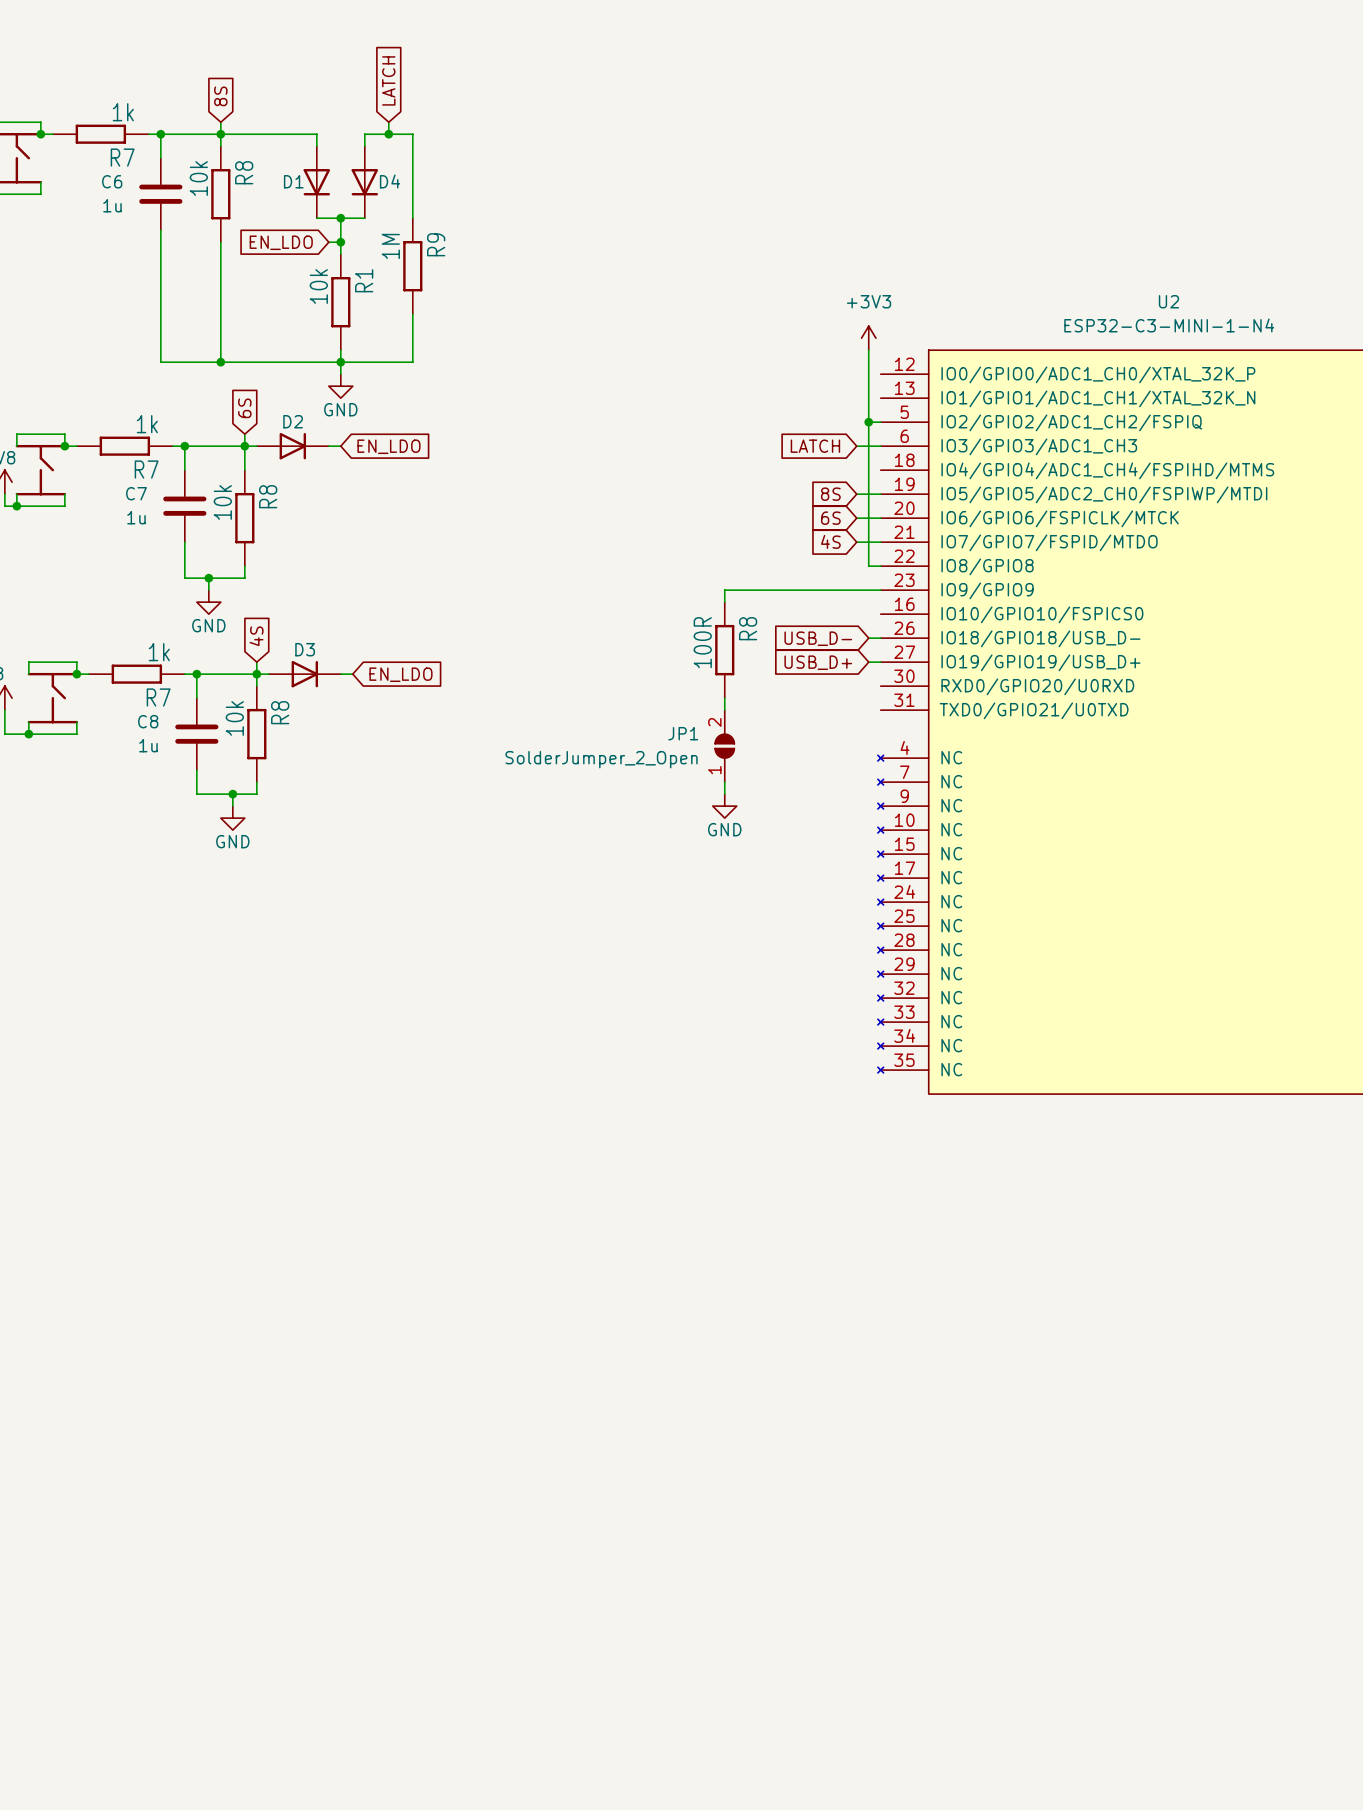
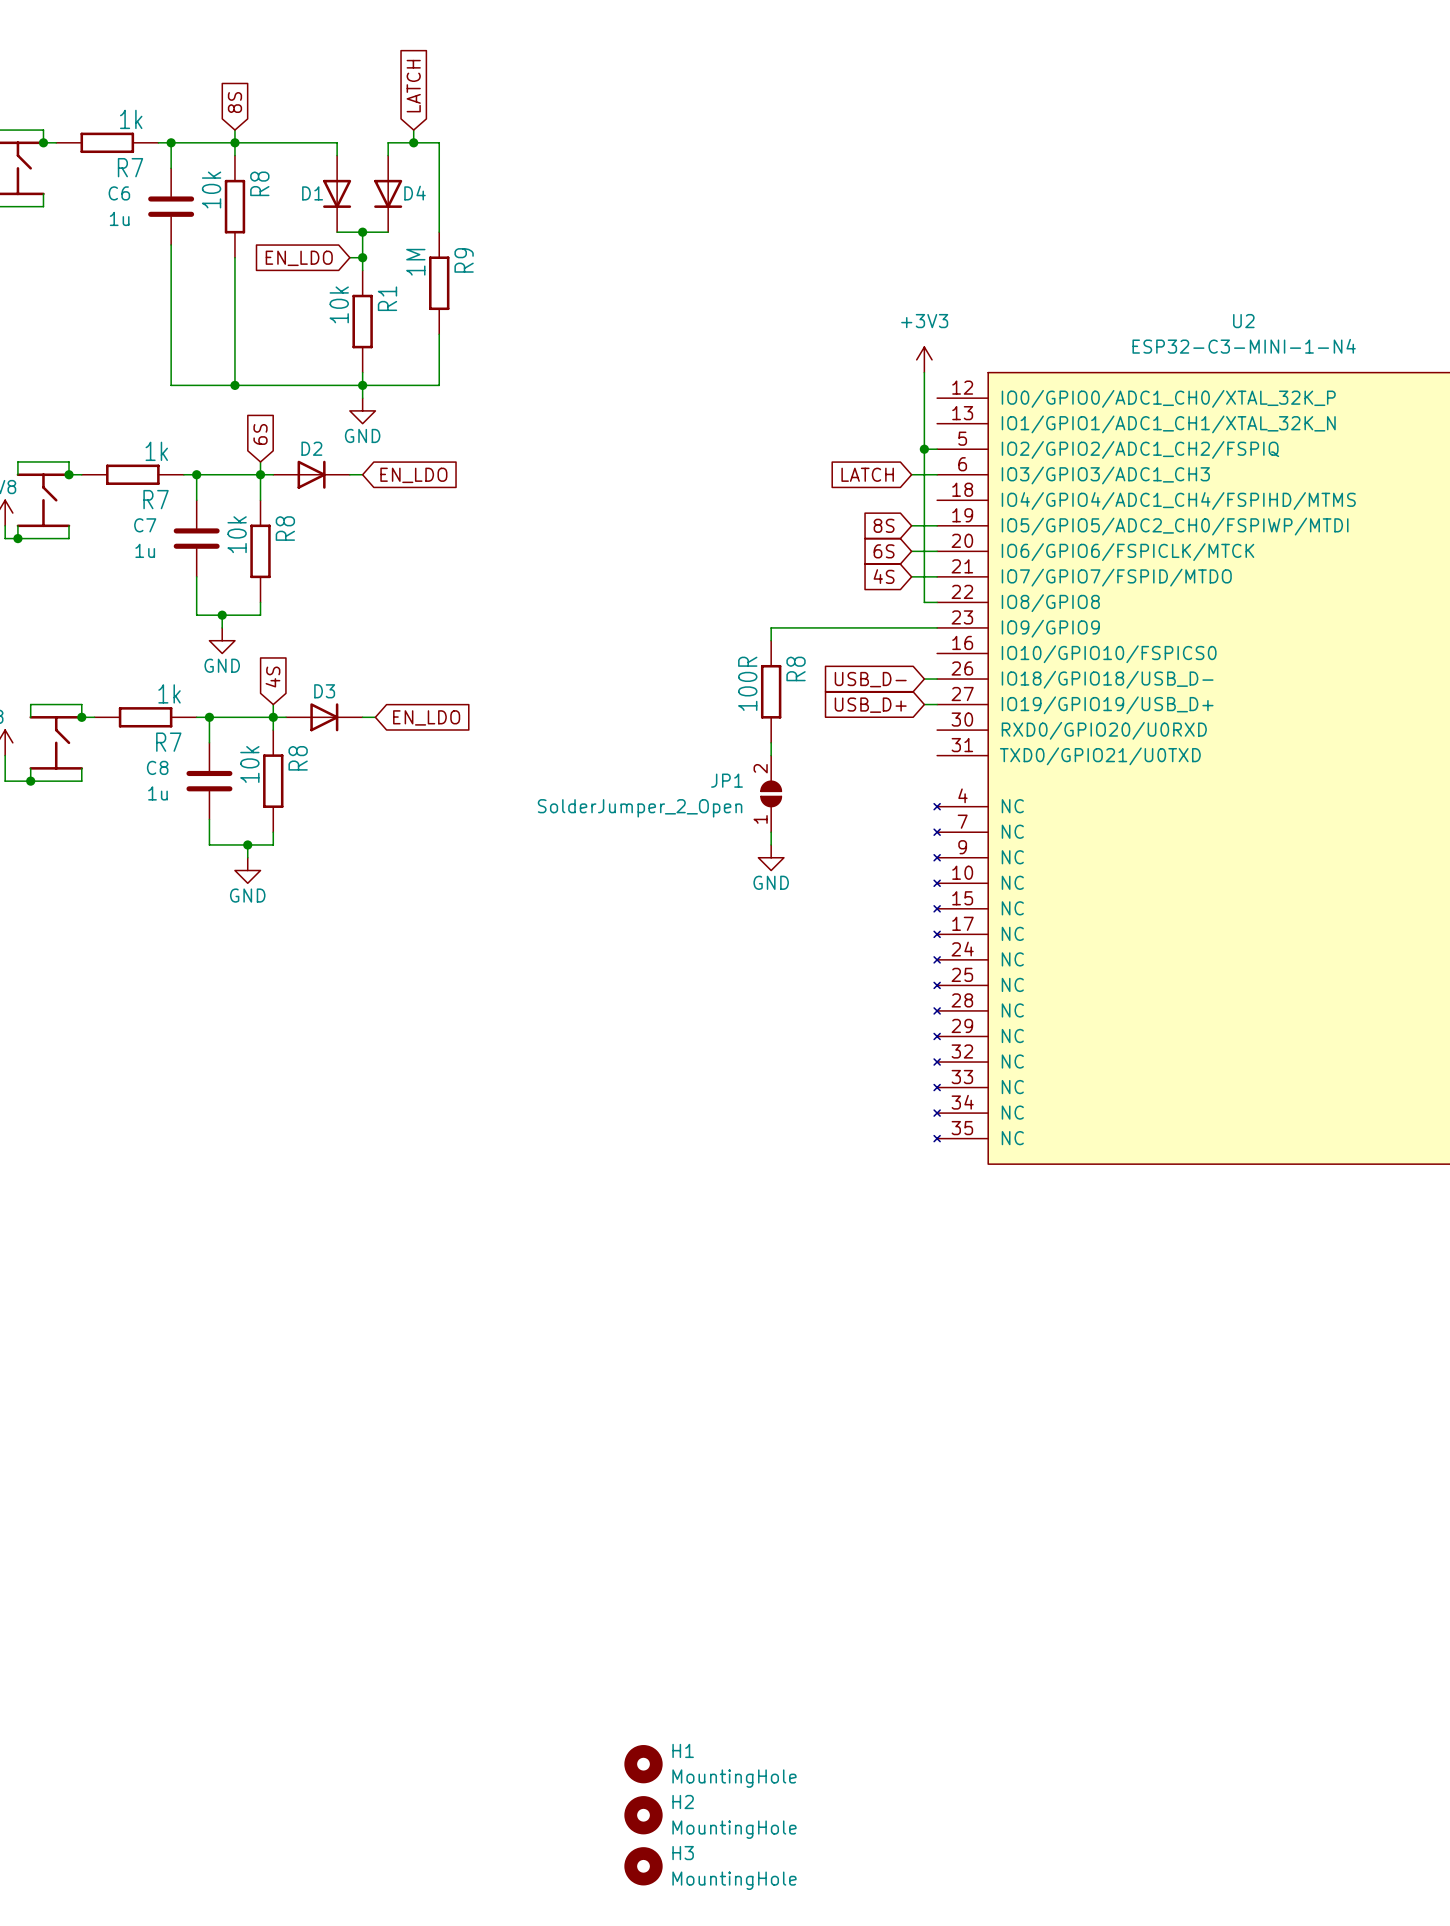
H1: none -> MountingHole (643, 1764)
H2: none -> MountingHole (643, 1815)
H3: none -> MountingHole (643, 1866)

